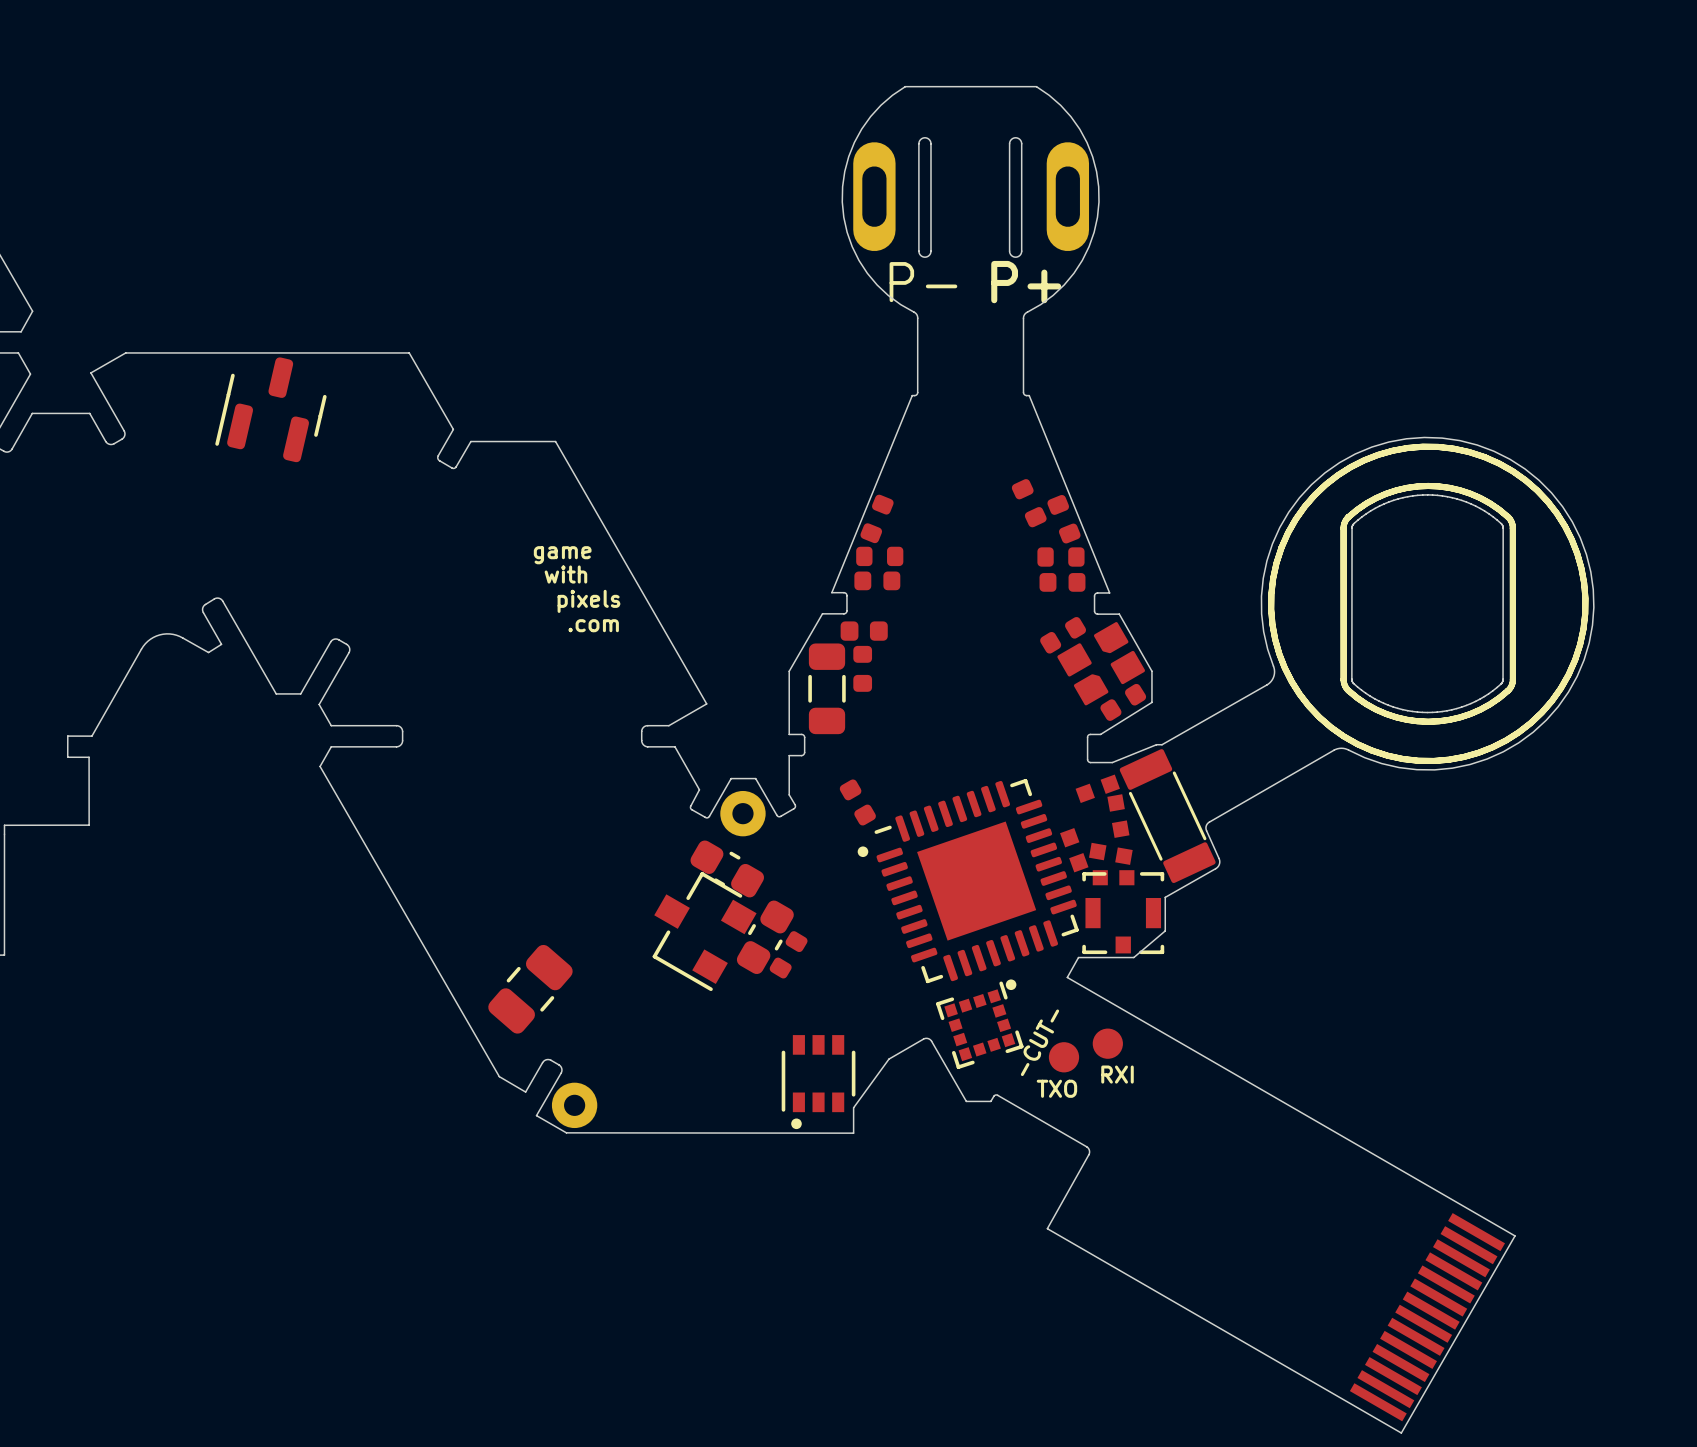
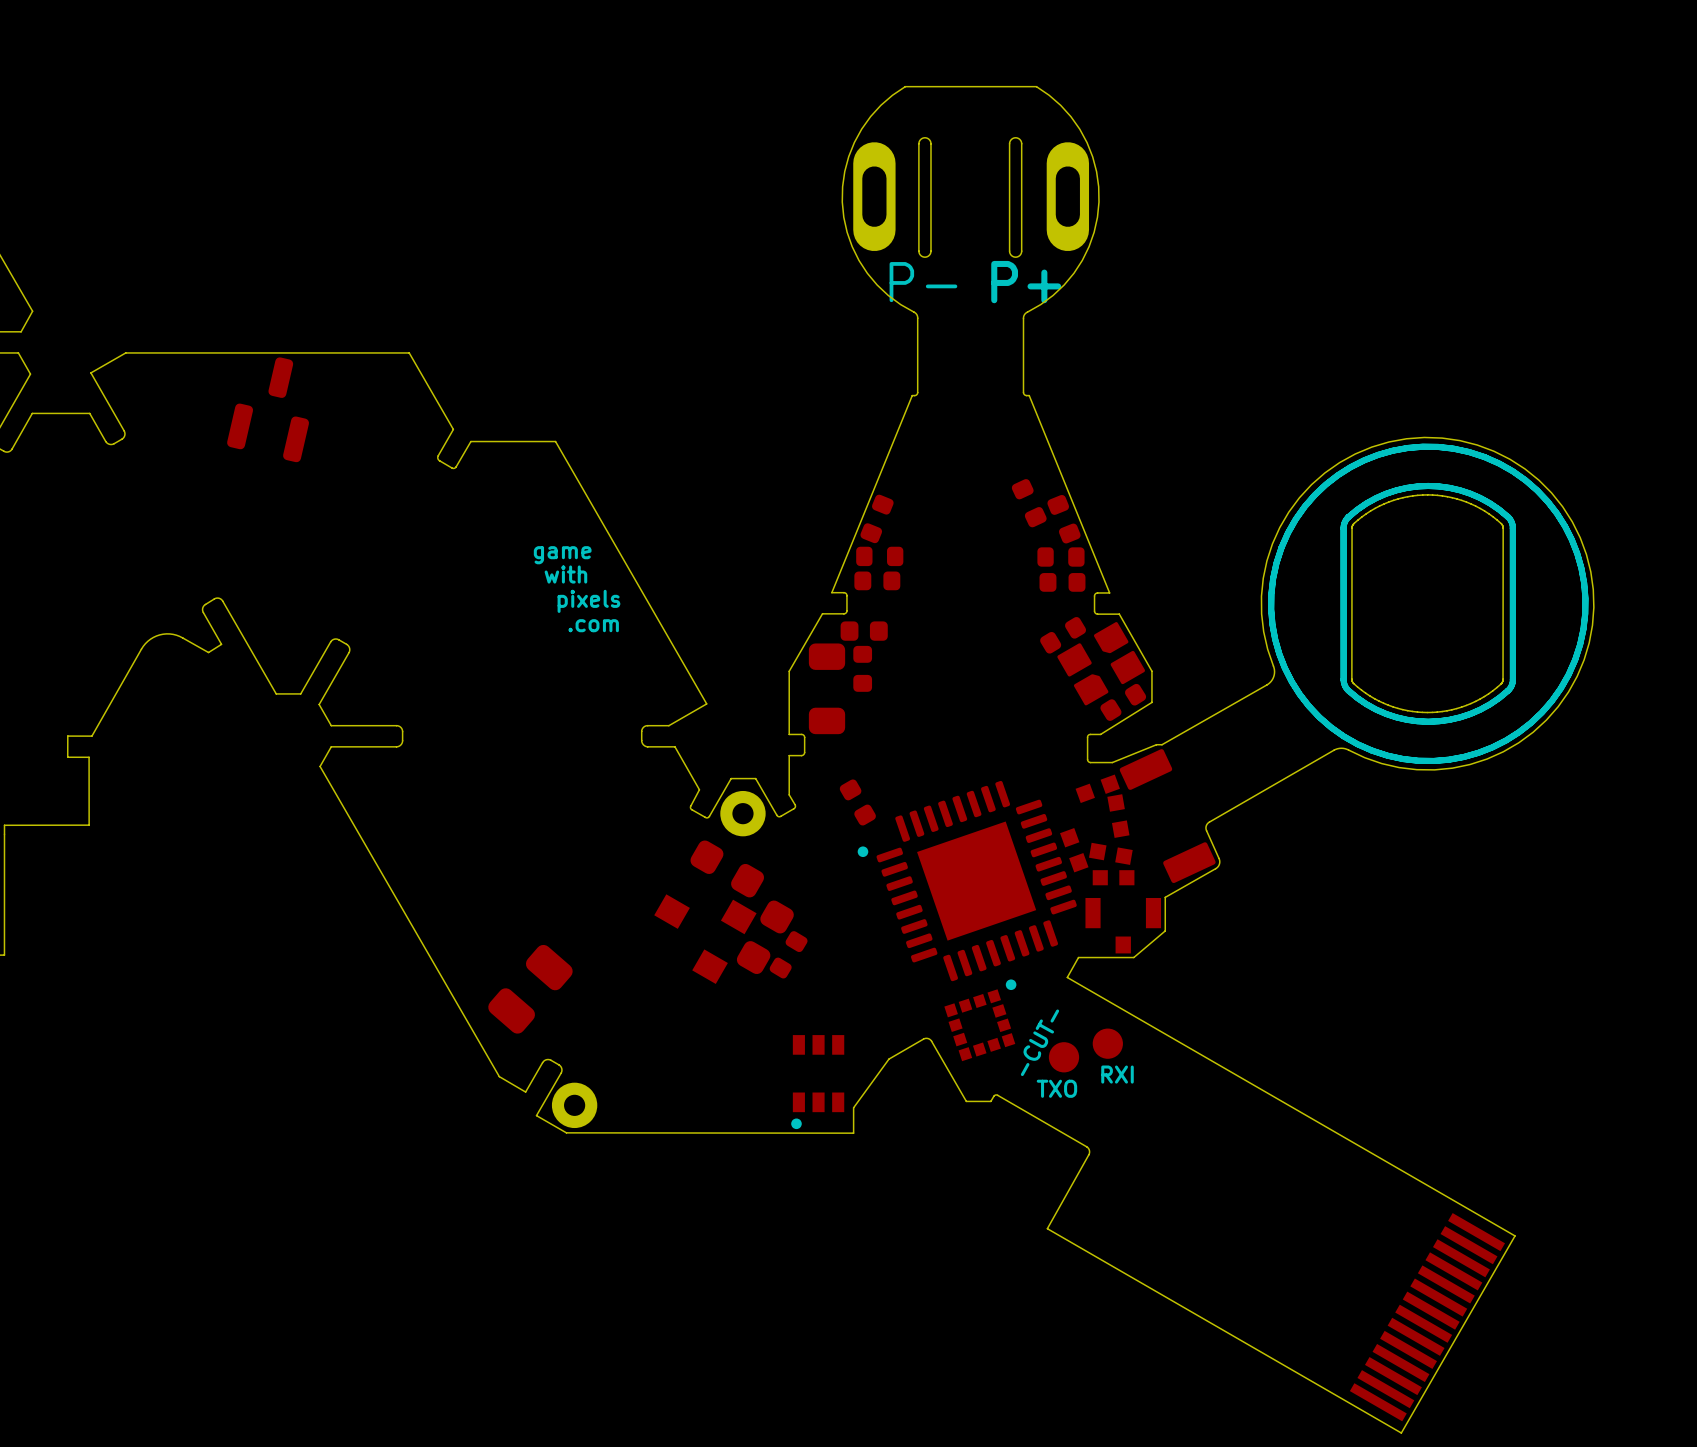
part footprint: [215, 357, 327, 463] -> [227, 357, 309, 463]
part footprint: [808, 643, 846, 735] -> [808, 643, 846, 735]
part footprint: [1119, 749, 1216, 884] -> [1119, 749, 1216, 884]
part footprint: [874, 778, 1079, 984] -> [876, 780, 1077, 982]
part footprint: [690, 840, 765, 898] -> [690, 840, 765, 898]
part footprint: [652, 872, 757, 992] -> [654, 894, 757, 984]
part footprint: [1082, 872, 1165, 955] -> [1085, 878, 1162, 954]
part footprint: [736, 900, 794, 975] -> [736, 900, 794, 975]
part footprint: [488, 944, 573, 1034] -> [488, 944, 573, 1034]
part footprint: [936, 981, 1024, 1069] -> [944, 989, 1016, 1062]
part footprint: [781, 1035, 856, 1113] -> [792, 1035, 845, 1113]

